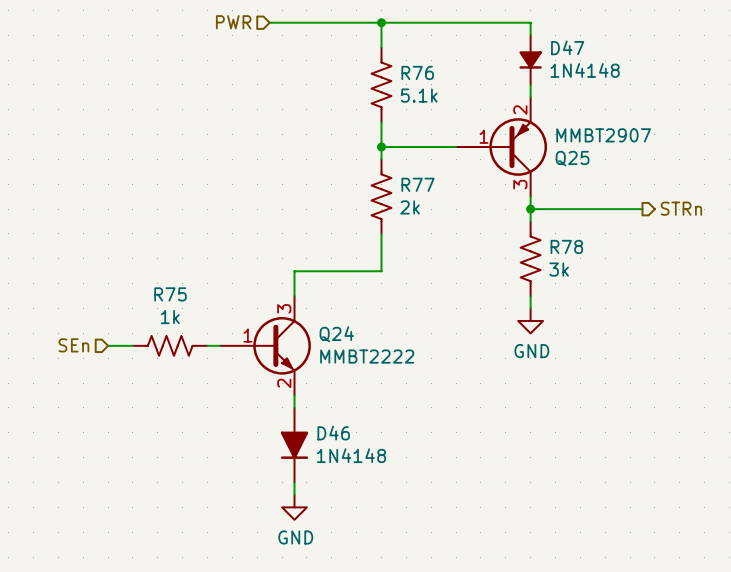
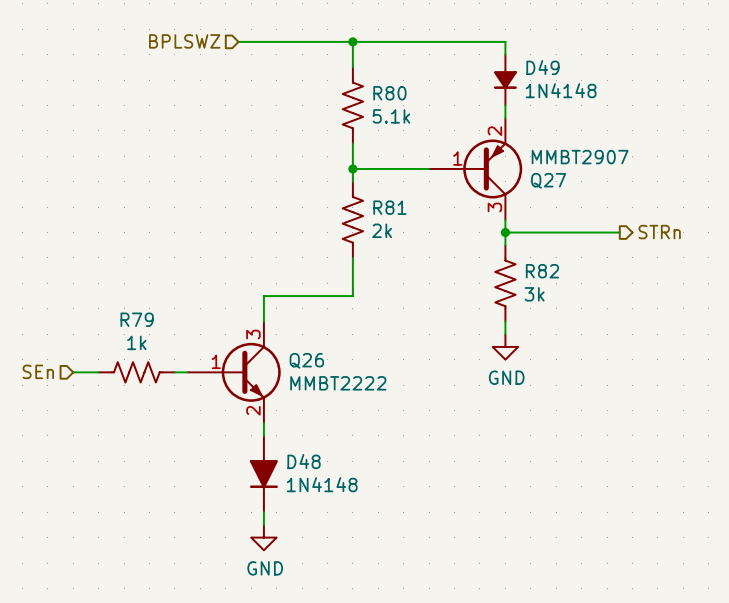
hierarchical label: PWR (233, 22) -> BPLSWZ (184, 41)
D47 name: D47 (567, 47) -> D49 (542, 67)
R76 name: R76 (417, 72) -> R80 (389, 93)
Q25 name: Q25 (572, 158) -> Q27 (548, 180)
R77 name: R77 (418, 184) -> R81 (389, 207)
R78 name: R78 (566, 246) -> R82 (542, 271)
R75 name: R75 (170, 294) -> R79 (137, 319)
Q24 name: Q24 (336, 334) -> Q26 (306, 360)
D46 name: D46 (333, 433) -> D48 (304, 461)

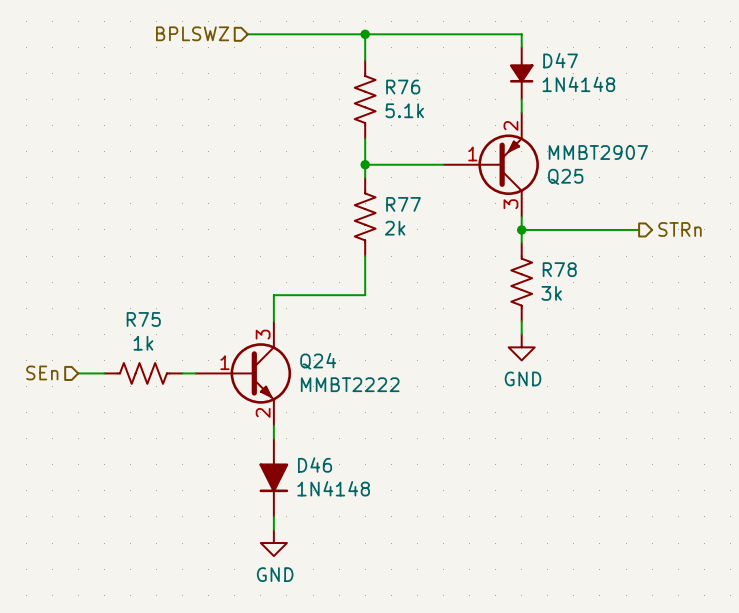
D49 name: D49 (542, 67) -> D47 (560, 60)
R80 name: R80 (389, 93) -> R76 (403, 87)
Q27 name: Q27 (548, 180) -> Q25 (565, 176)
R81 name: R81 (389, 207) -> R77 (403, 204)
R82 name: R82 (542, 271) -> R78 (559, 269)
R79 name: R79 (137, 319) -> R75 (143, 319)
Q26 name: Q26 (306, 360) -> Q24 (318, 361)
D48 name: D48 (304, 461) -> D46 (315, 465)

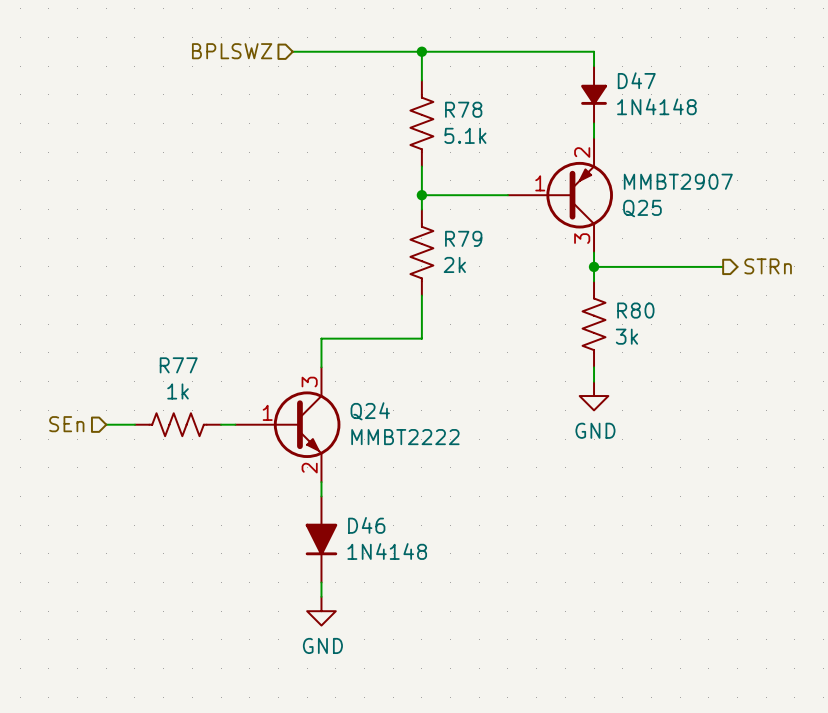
R76 name: R76 (403, 87) -> R78 (463, 109)
R77 name: R77 (403, 204) -> R79 (463, 238)
R78 name: R78 (559, 269) -> R80 (635, 310)
R75 name: R75 (143, 319) -> R77 (178, 365)

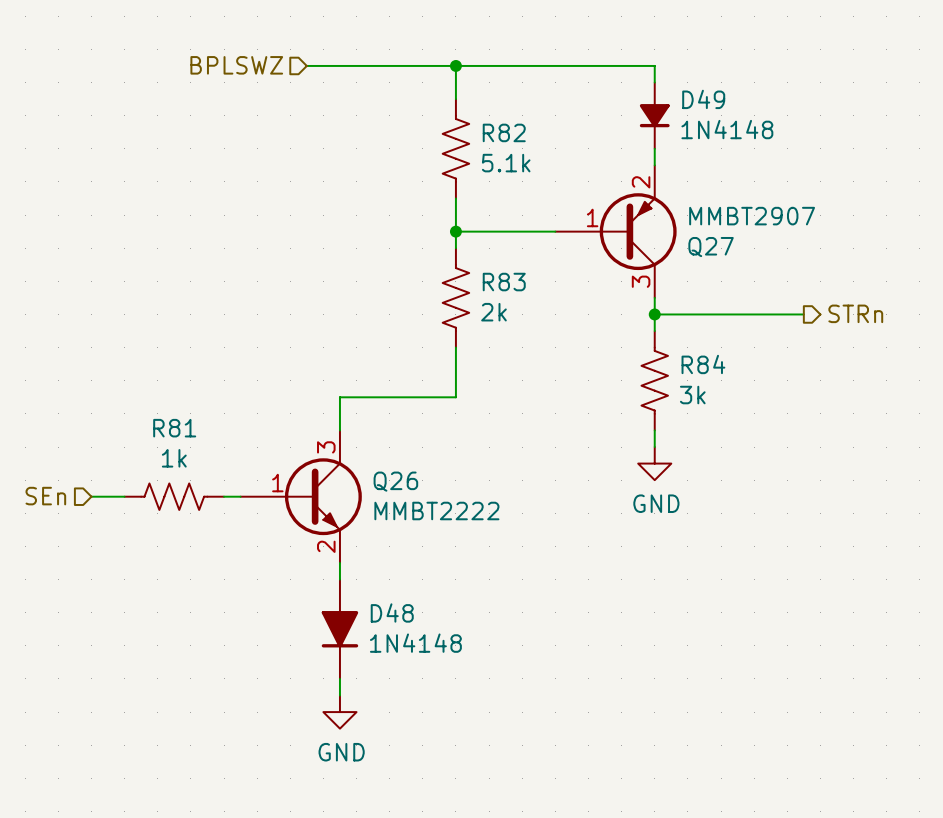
D47 name: D47 (636, 80) -> D49 (703, 99)
R78 name: R78 (463, 109) -> R82 (504, 132)
Q25 name: Q25 (642, 208) -> Q27 (711, 247)
R79 name: R79 (463, 238) -> R83 (504, 282)
R80 name: R80 (635, 310) -> R84 (703, 364)
R77 name: R77 (178, 365) -> R81 (174, 428)
Q24 name: Q24 (370, 411) -> Q26 (395, 481)
D46 name: D46 (366, 525) -> D48 (392, 612)

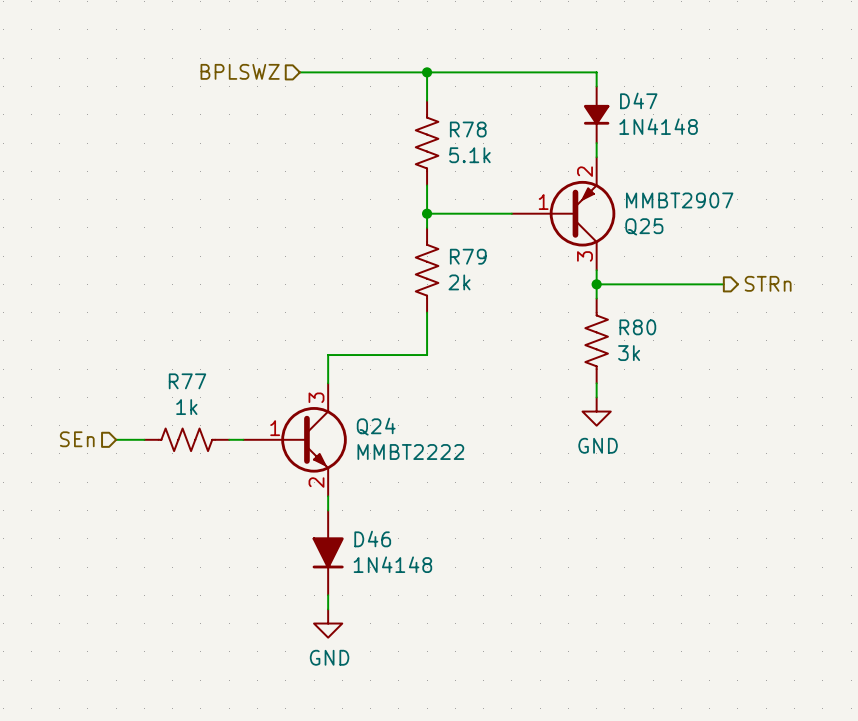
D49 name: D49 (703, 99) -> D47 (638, 100)
R82 name: R82 (504, 132) -> R78 (468, 129)
Q27 name: Q27 (711, 247) -> Q25 (644, 226)
R83 name: R83 (504, 282) -> R79 (468, 256)
R84 name: R84 (703, 364) -> R80 (637, 327)
R81 name: R81 (174, 428) -> R77 (187, 381)
Q26 name: Q26 (395, 481) -> Q24 (376, 426)
D48 name: D48 (392, 612) -> D46 (372, 539)

